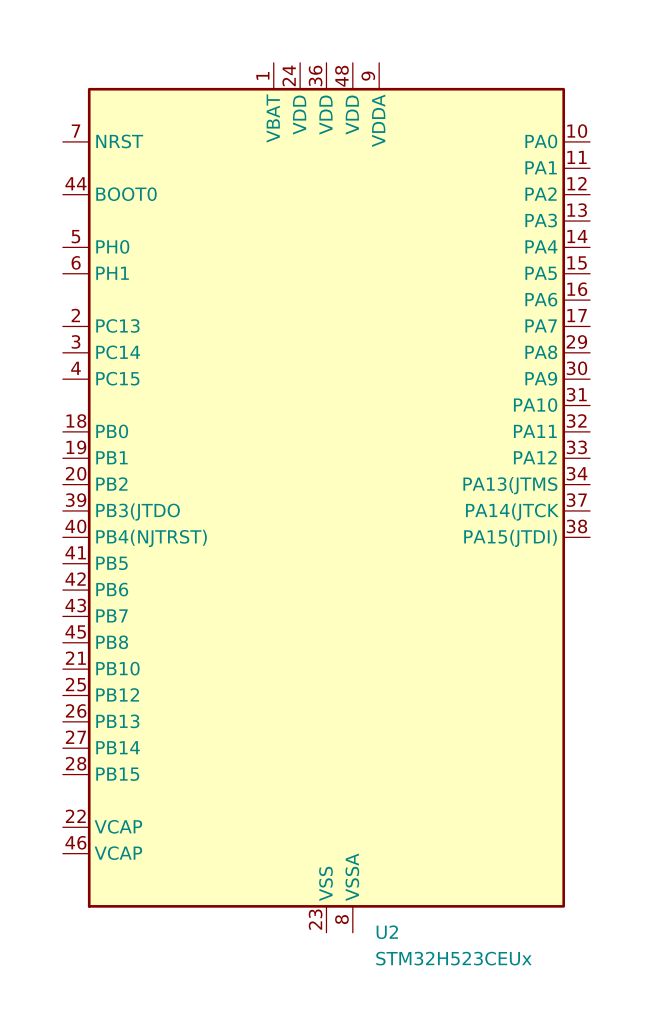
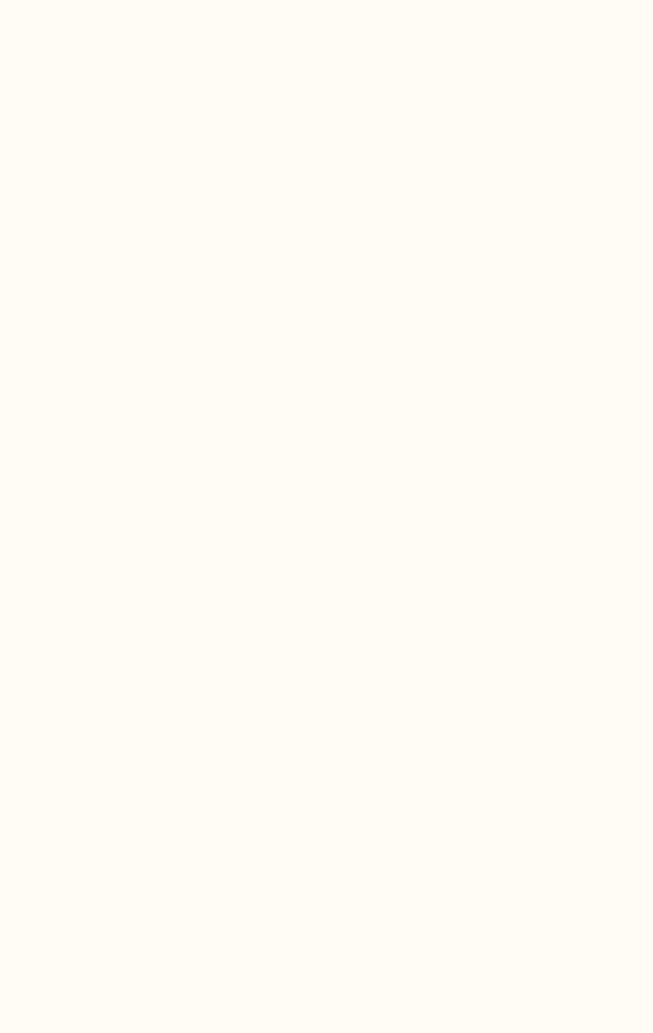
U2: STM32H523CEUx (326, 497) -> none

